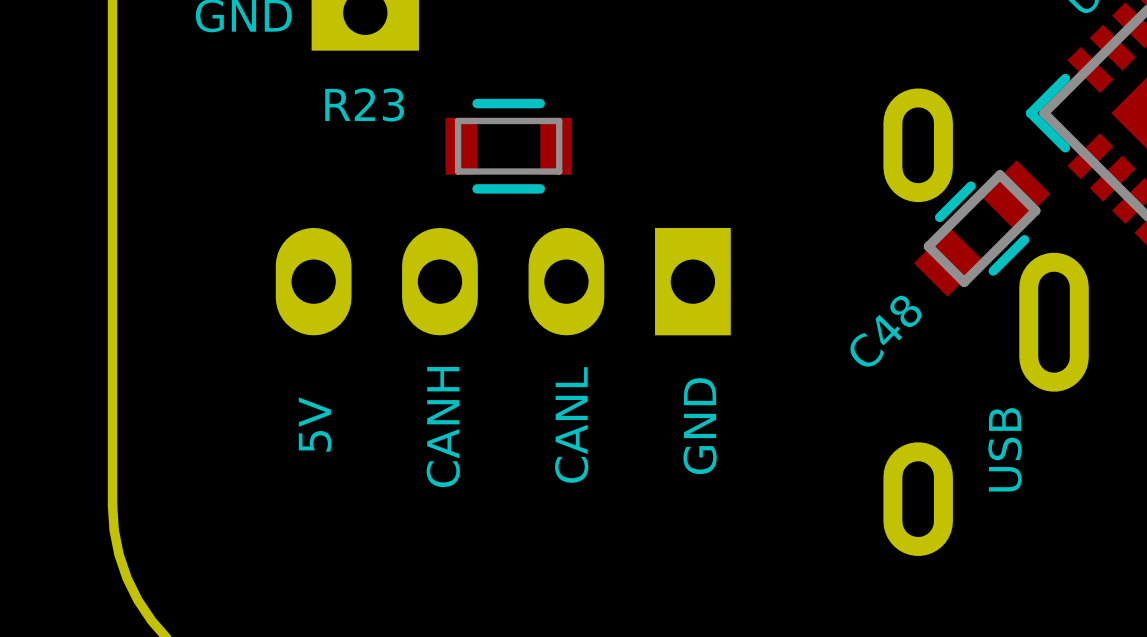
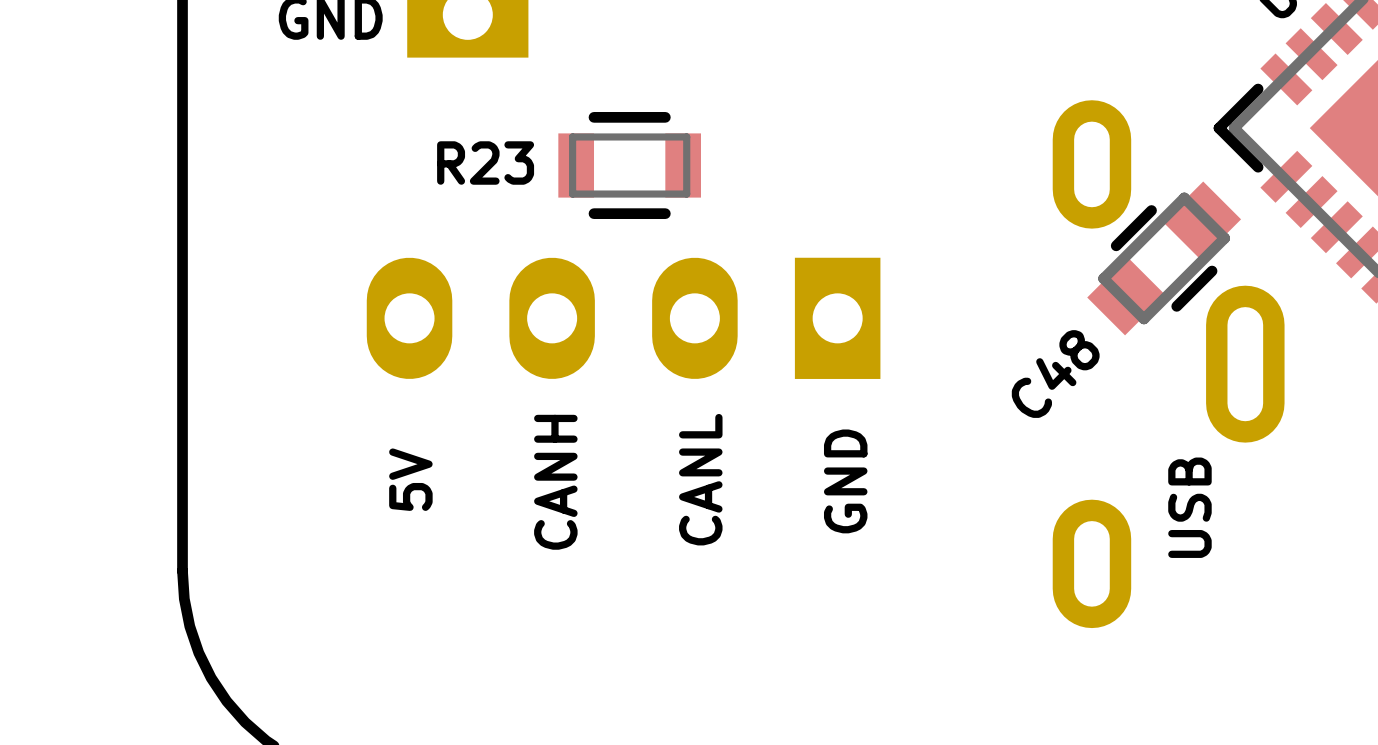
R23 name position: R23 (364, 104) -> R23 (485, 163)

